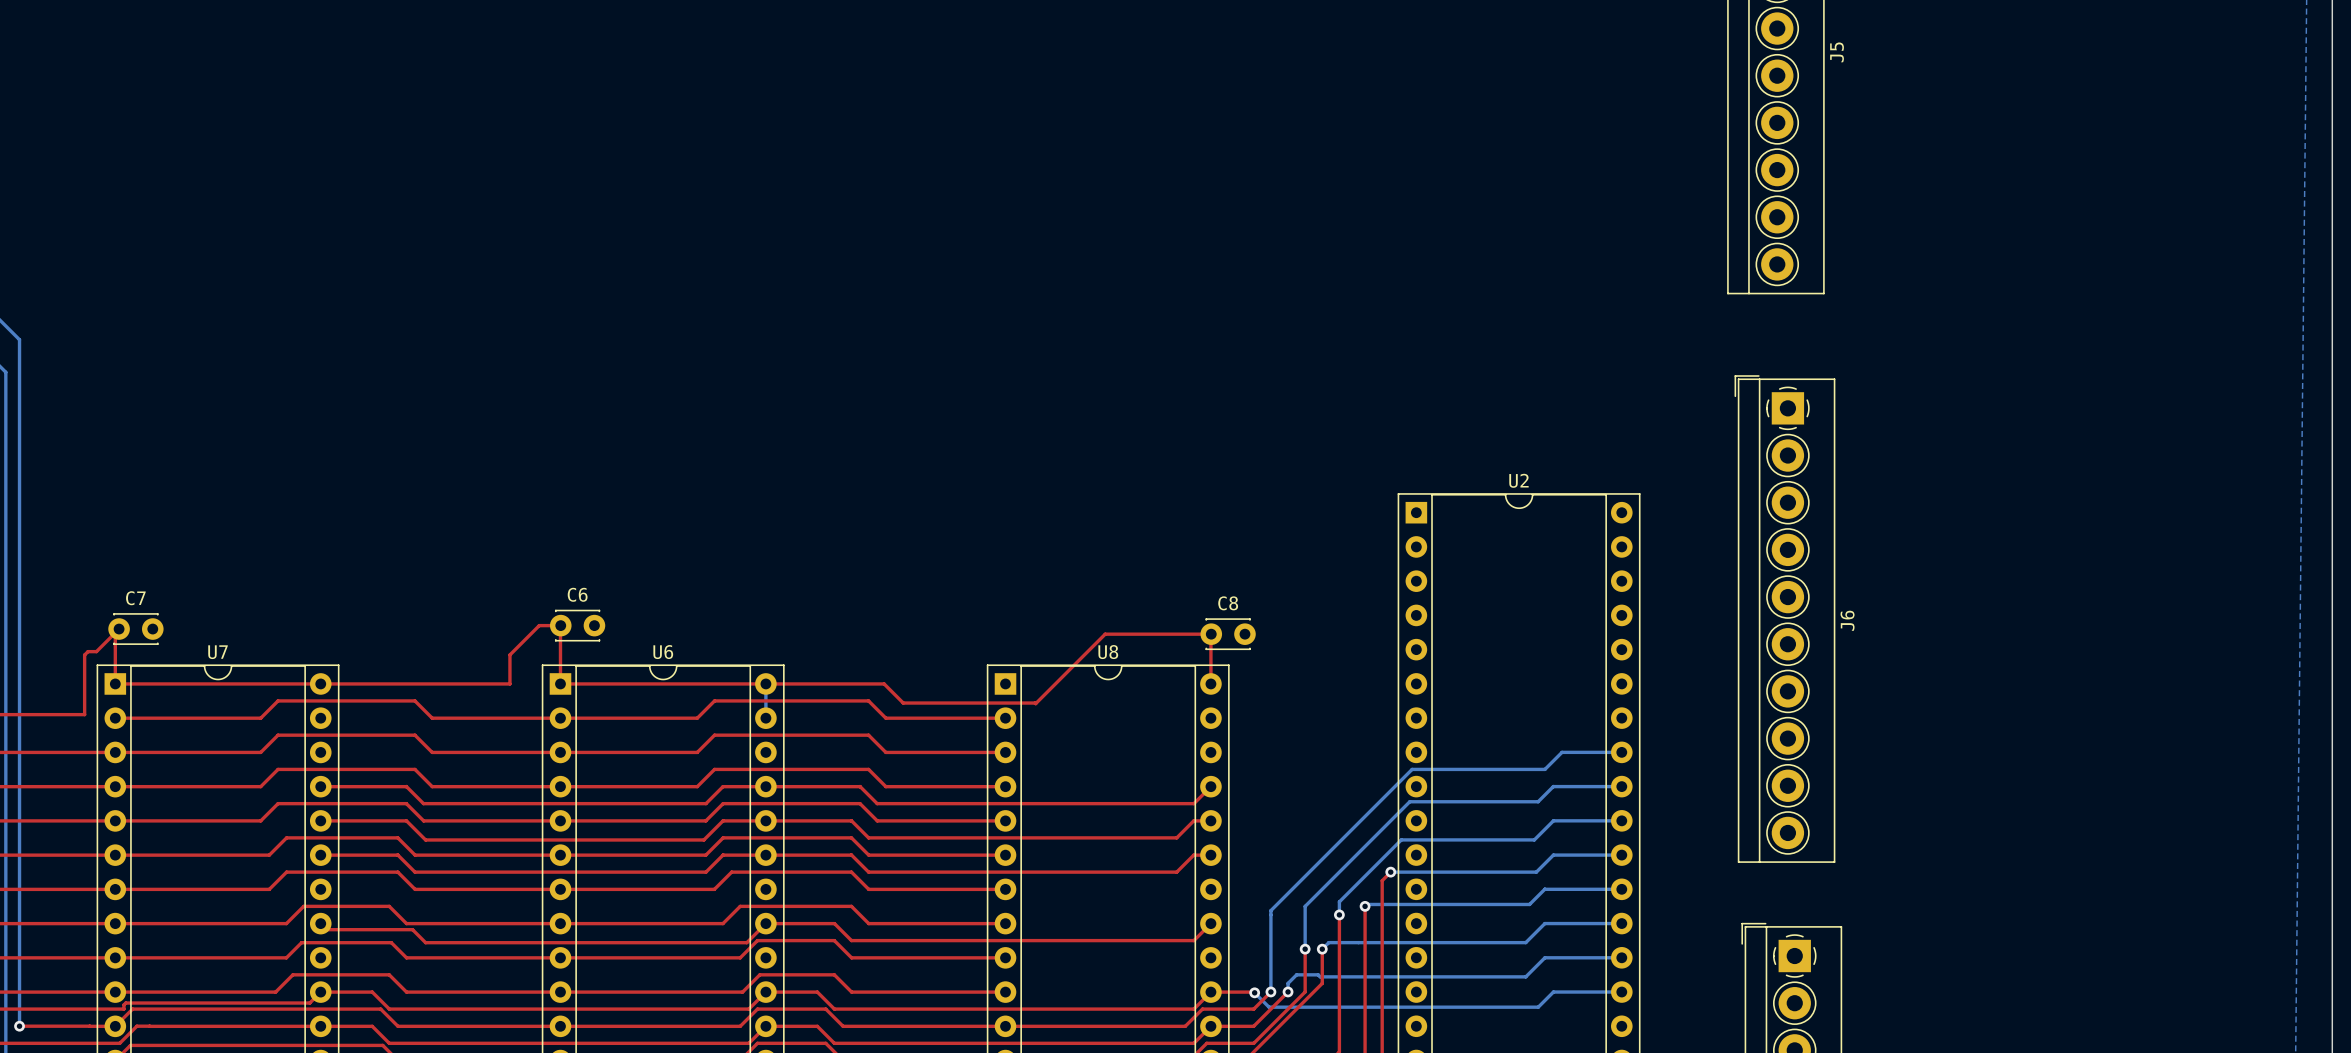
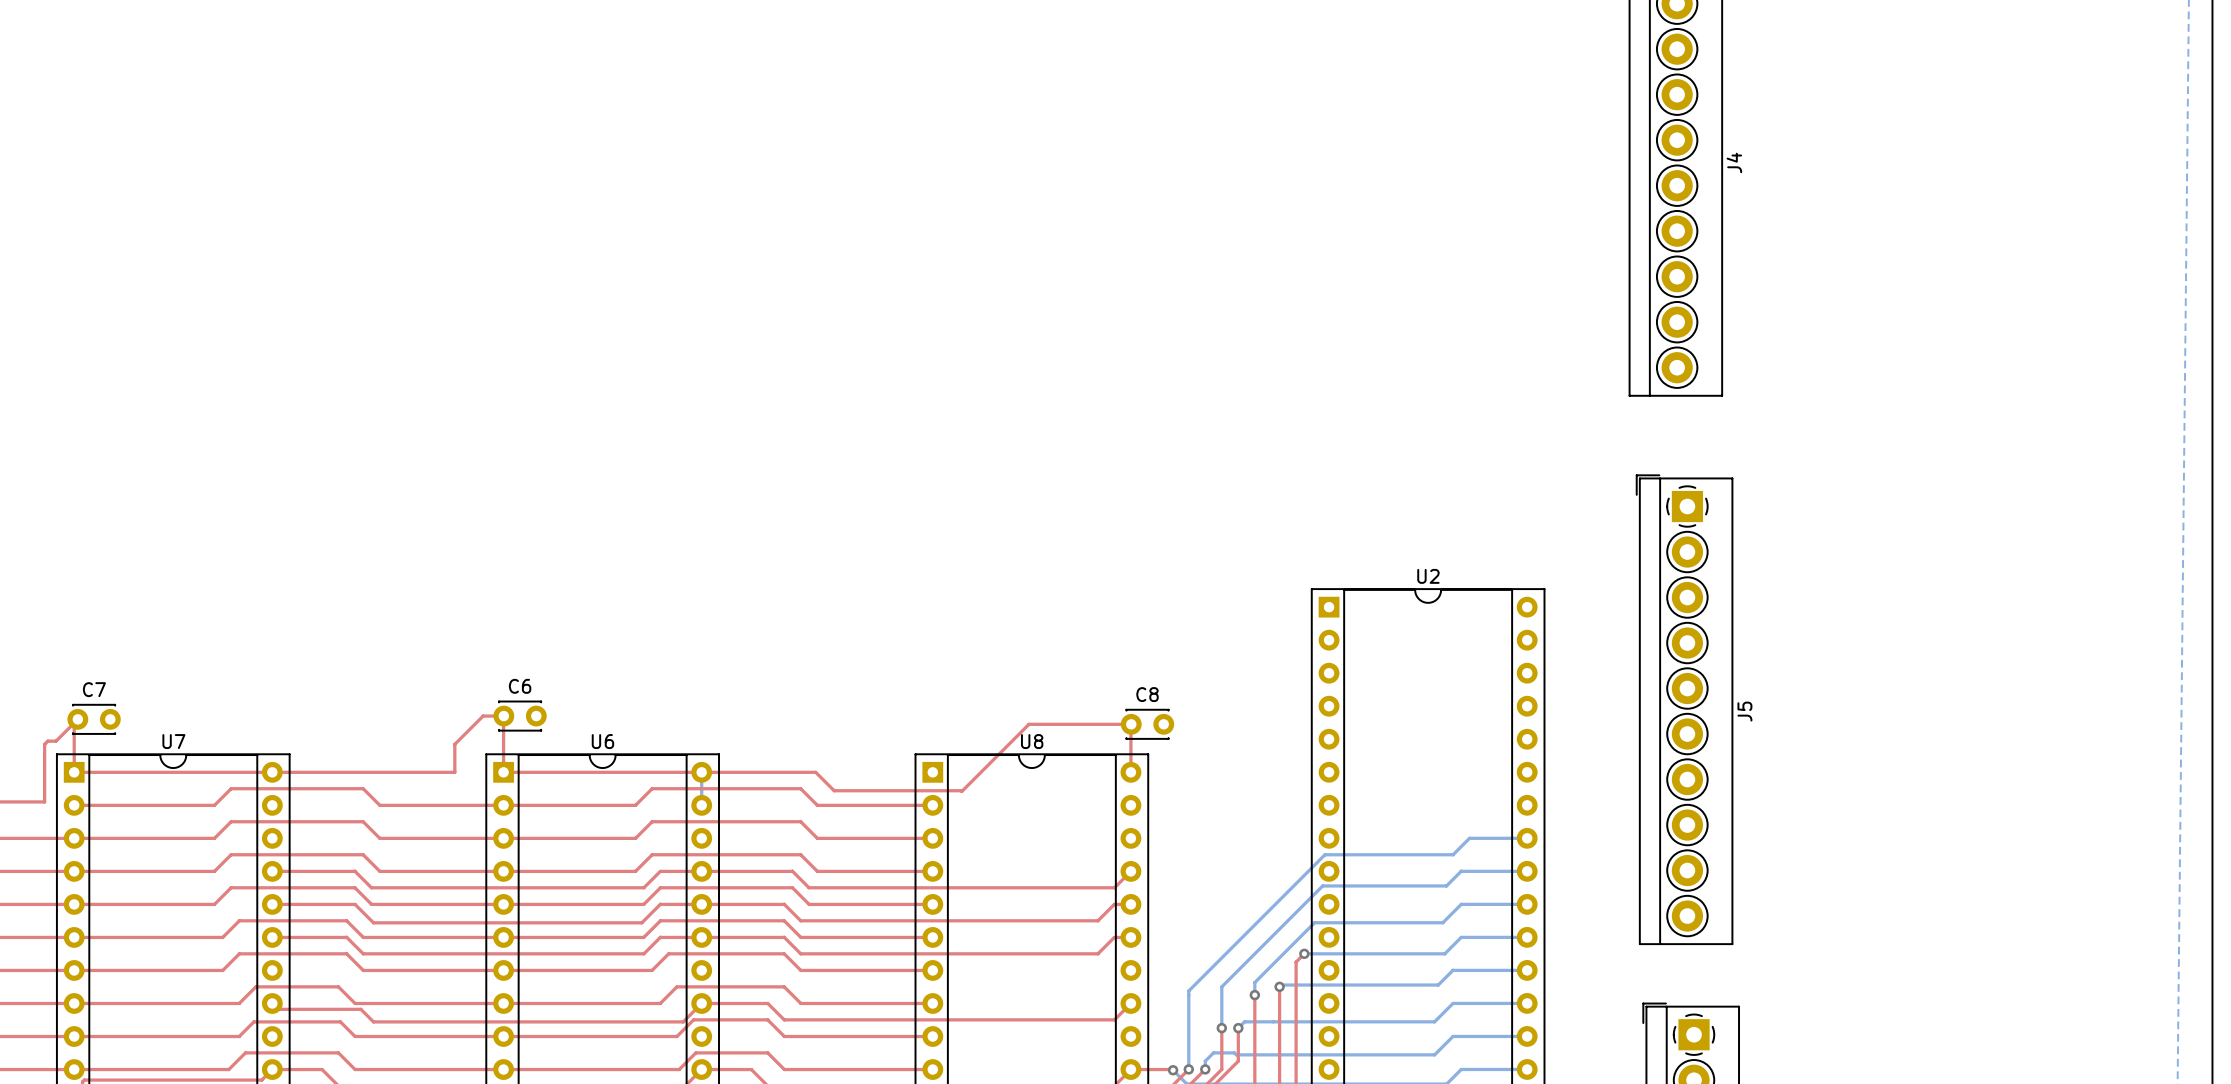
J5 name: J5 (1837, 52) -> J4 (1734, 162)
J6 name: J6 (1847, 620) -> J5 (1744, 711)

